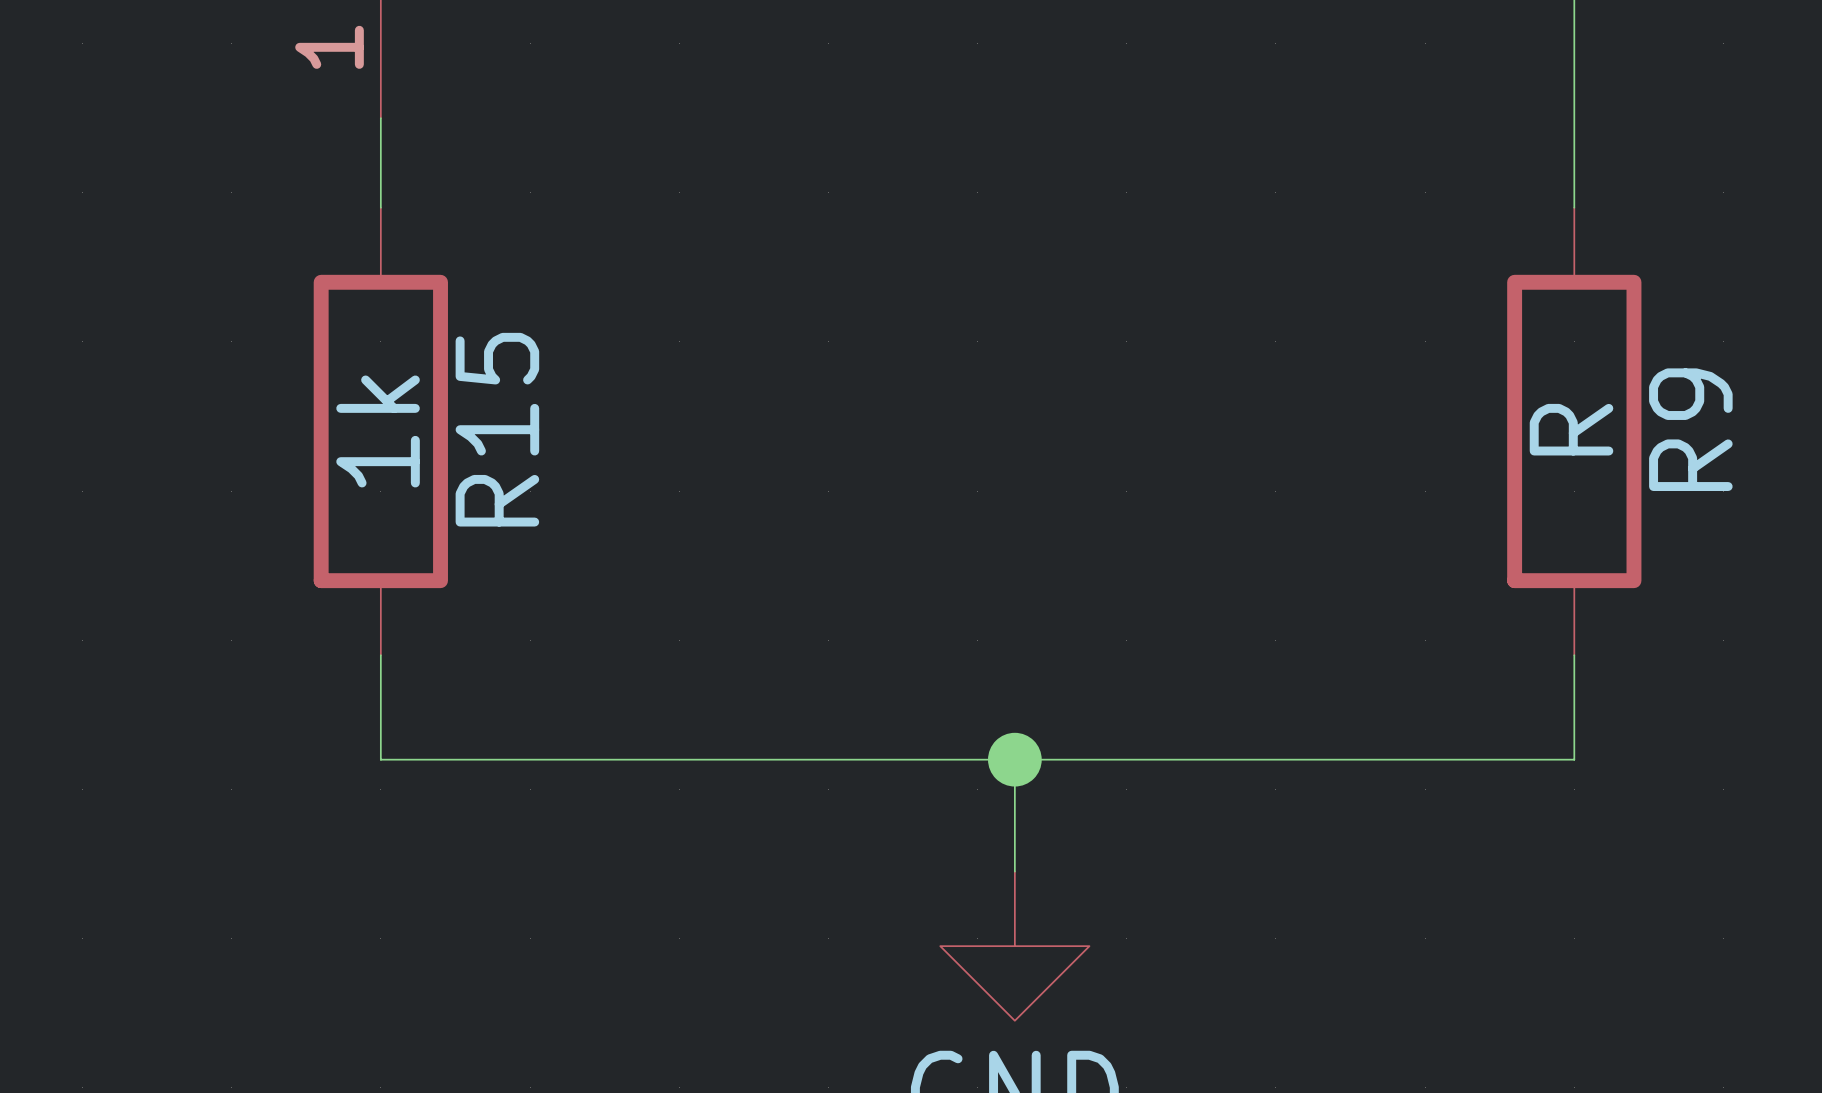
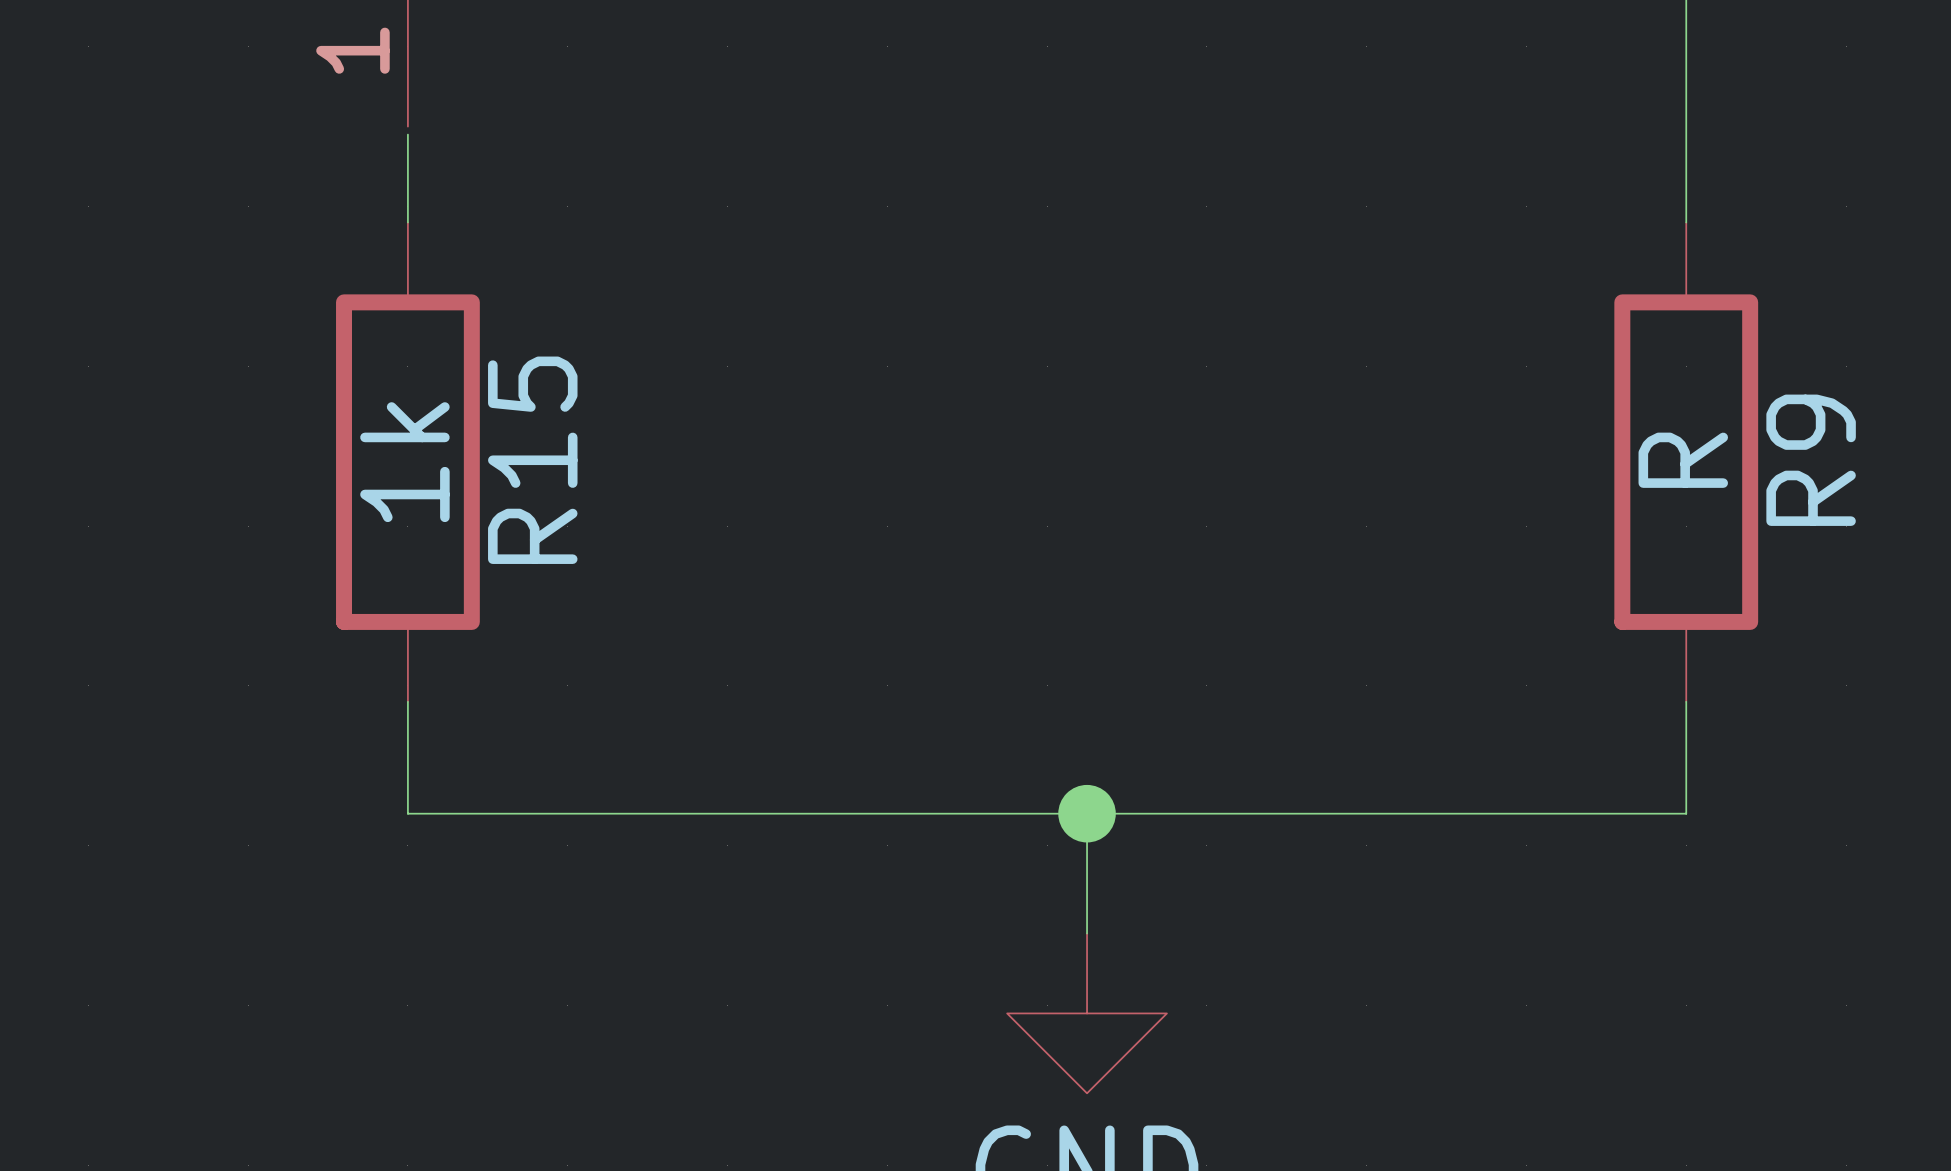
wire: (380, 118) (380, 125) -> none

